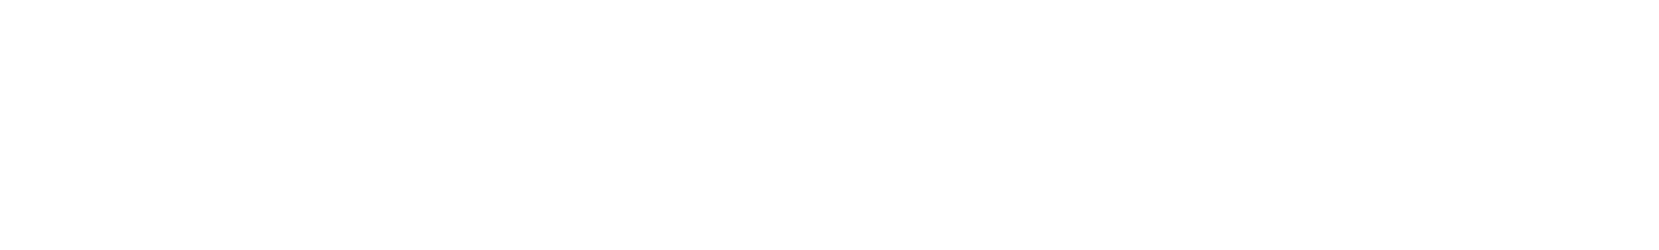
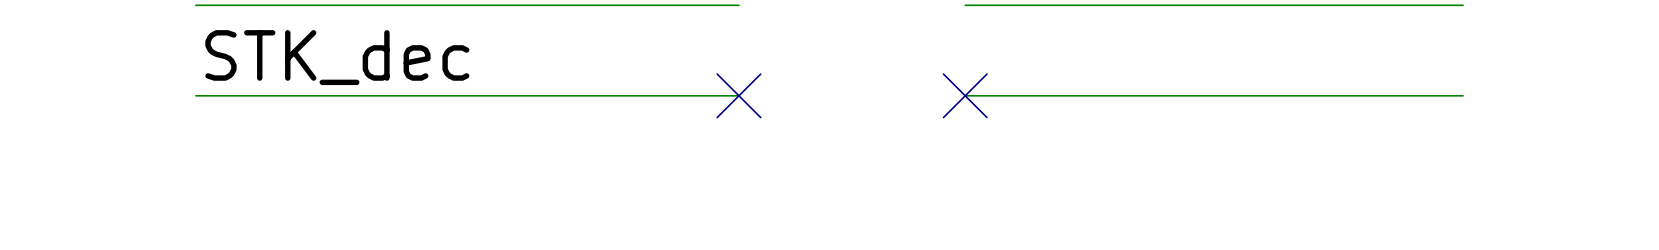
wire: none -> (195, 5) (738, 5)
wire: none -> (965, 5) (1463, 5)
label: none -> STK_dec (337, 57)
wire: none -> (195, 95) (738, 95)
no-connect mark: none -> (738, 95)
wire: none -> (965, 95) (1463, 95)
no-connect mark: none -> (965, 95)

